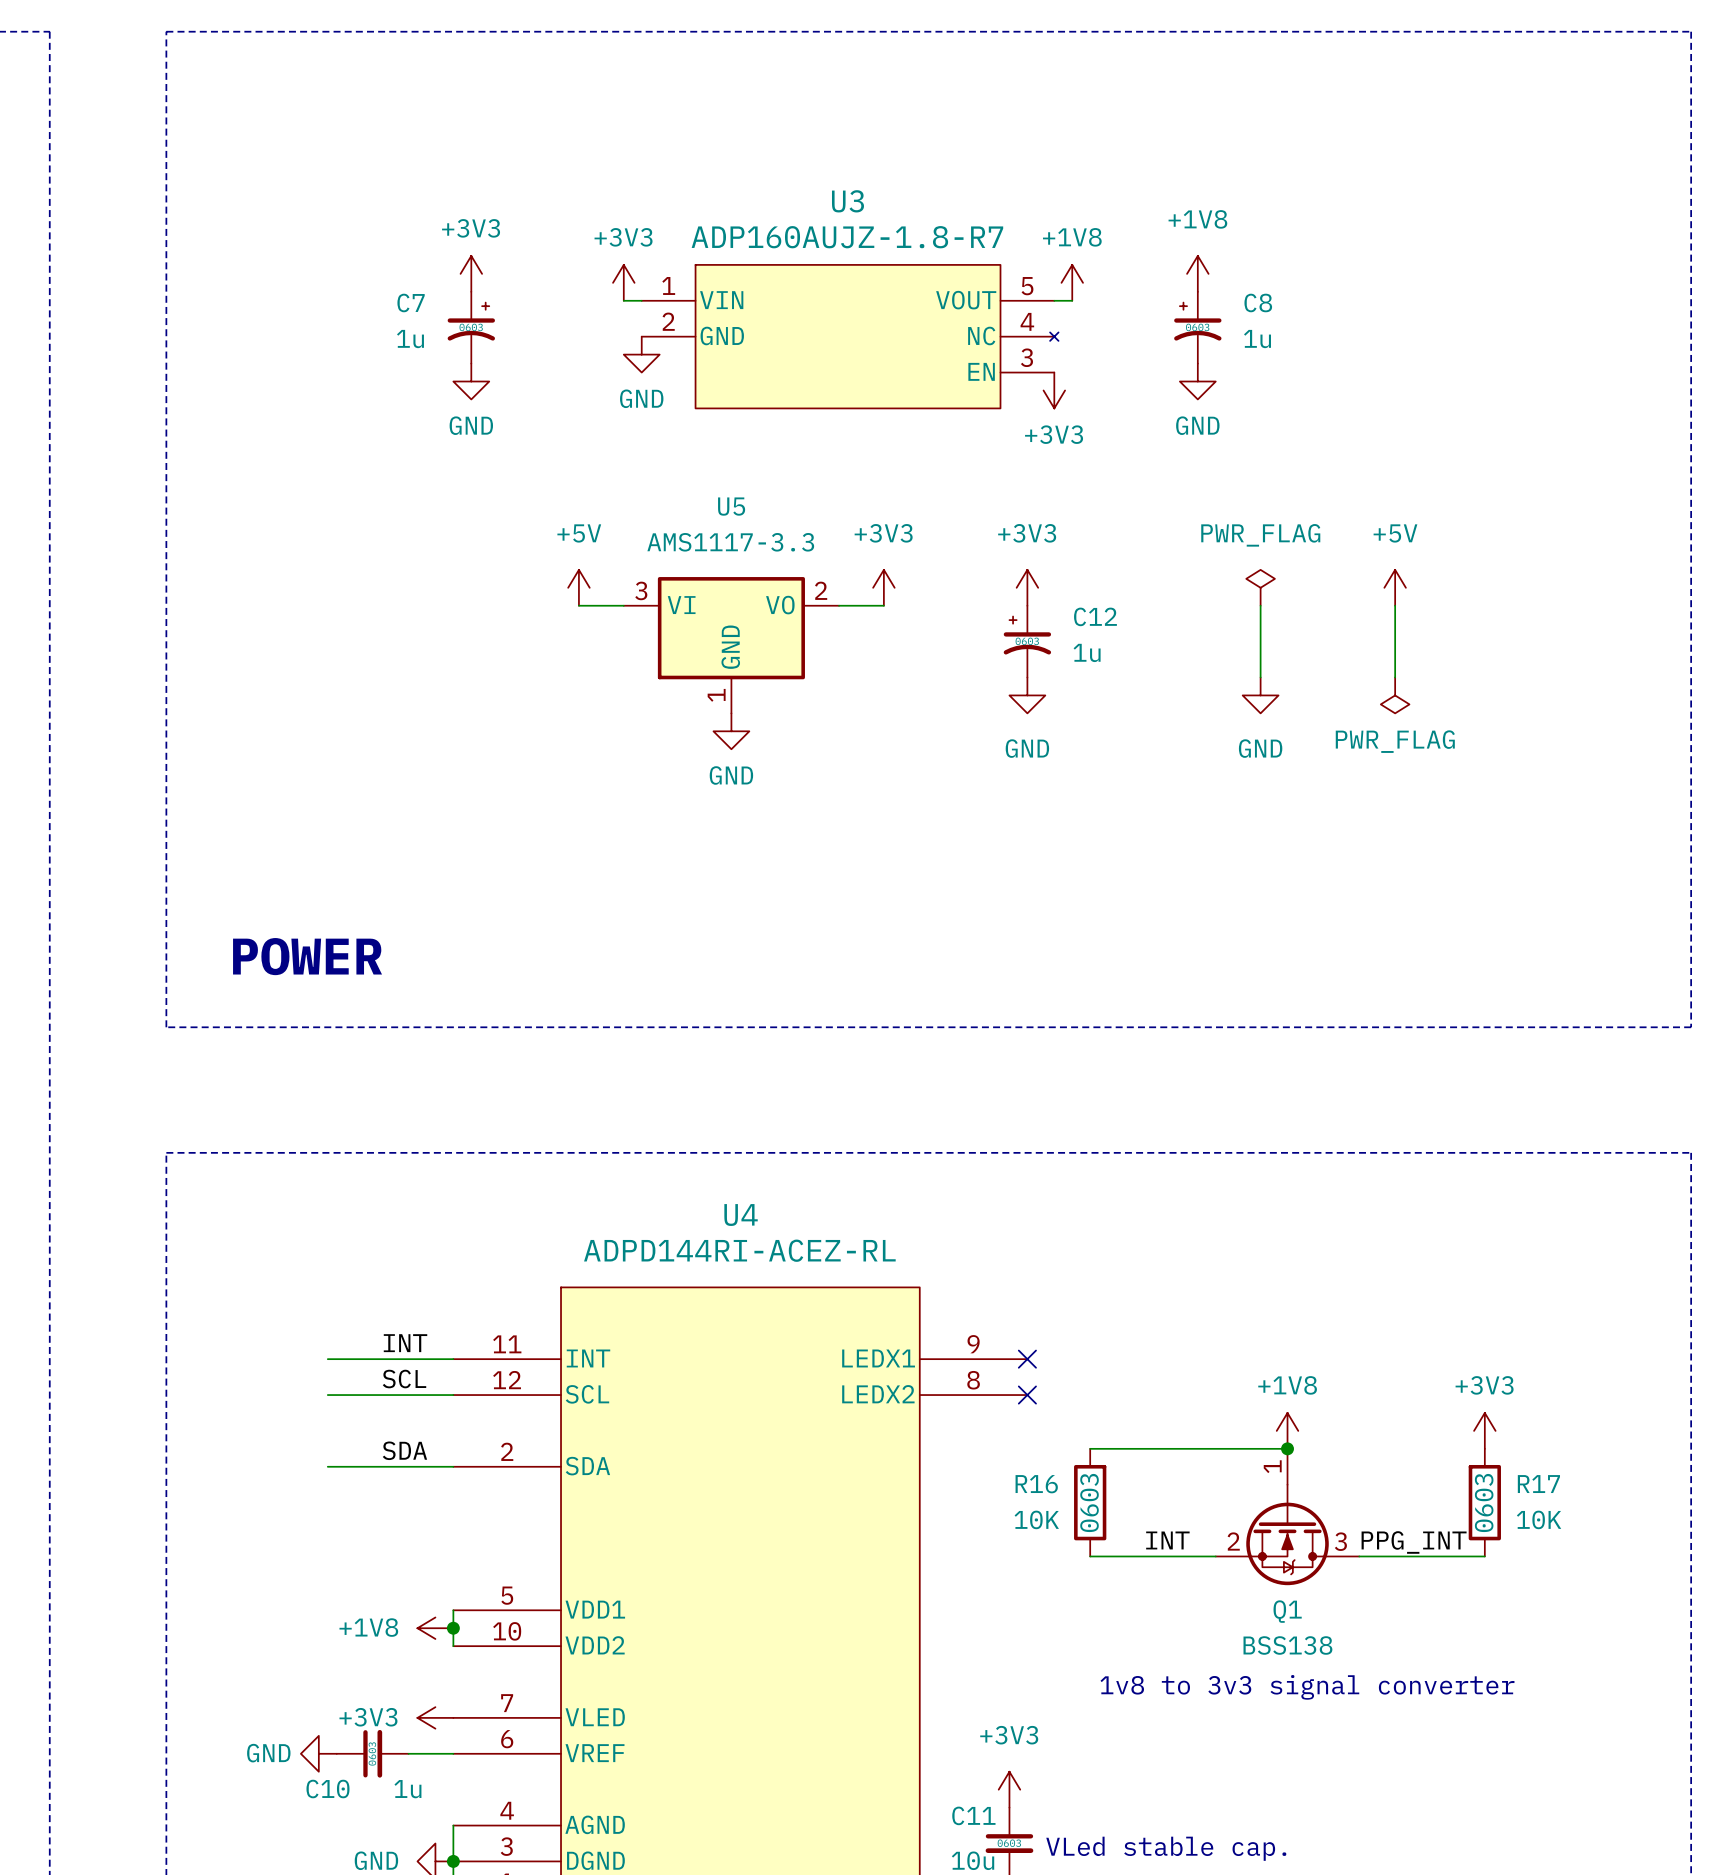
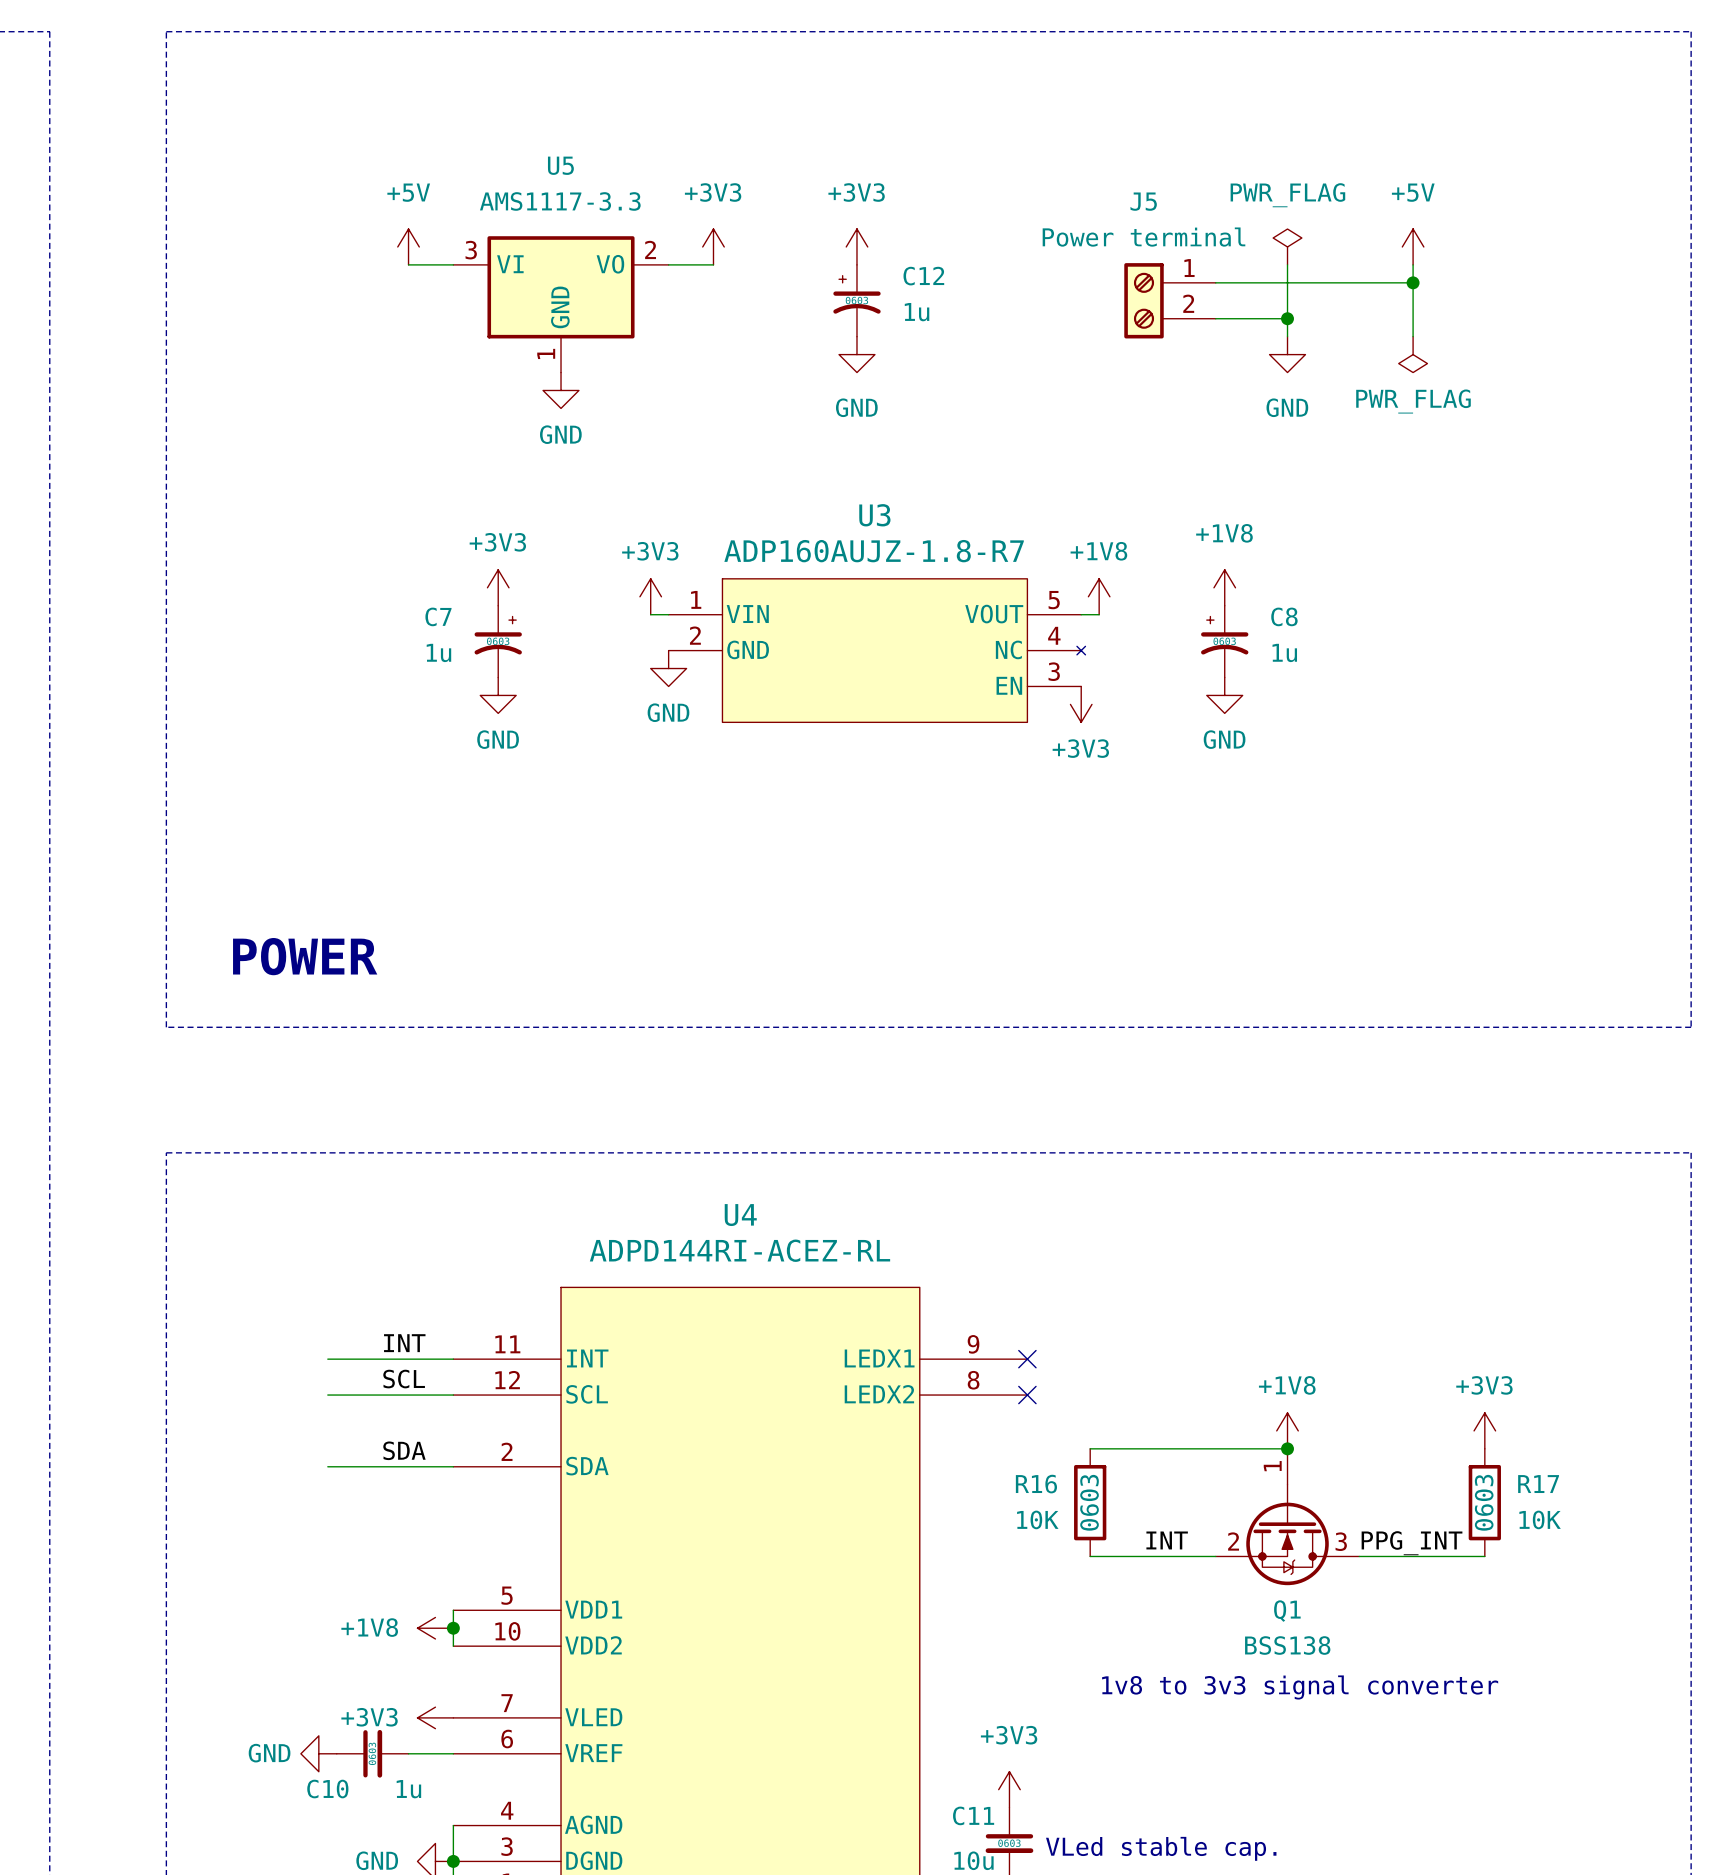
power symbol text position: +3V3 (623, 237) -> +3V3 (713, 192)
power symbol: none -> +5V (408, 246)
power symbol: none -> +3V3 (856, 246)
power symbol: none -> PWR_FLAG (1287, 246)
wire: none -> (408, 264) (453, 264)
power symbol: +3V3 (471, 273) -> none
power symbol: +1V8 (1197, 273) -> none
power symbol position: +3V3 (623, 282) -> +3V3 (713, 246)
power symbol: +1V8 (1072, 282) -> none
wire: none -> (1215, 282) (1413, 282)
junction: none -> (1413, 282)
wire: (1054, 300) (1072, 300) -> (1081, 614) (1099, 614)
J5: none -> Power terminal (1170, 300)
wire: none -> (1215, 318) (1287, 318)
junction: none -> (1287, 318)
C7 position: (471, 327) -> (498, 641)
C8 position: (1197, 327) -> (1224, 641)
U3 position: (850, 336) -> (877, 650)
power symbol: GND (641, 354) -> none
power symbol: none -> GND (856, 354)
power symbol: none -> PWR_FLAG (1413, 354)
power symbol: GND (471, 381) -> none
power symbol position: GND (1197, 381) -> GND (1287, 354)
power symbol: none -> GND (561, 390)
power symbol: +3V3 (1054, 390) -> none
power symbol text position: GND (1197, 425) -> GND (1287, 407)
power symbol: none -> +3V3 (498, 587)
power symbol: +5V (578, 587) -> none
power symbol: +3V3 (883, 587) -> none
power symbol: +3V3 (1027, 587) -> none
power symbol: none -> +1V8 (1224, 587)
power symbol: PWR_FLAG (1260, 587) -> none
power symbol position: +5V (1395, 587) -> +5V (1413, 246)
power symbol: none -> +3V3 (650, 596)
power symbol: none -> +1V8 (1099, 596)
wire: (578, 605) (623, 605) -> (668, 264) (713, 264)
wire: (1260, 605) (1260, 677) -> (1287, 264) (1287, 336)
wire: (1395, 605) (1395, 677) -> (1413, 264) (1413, 336)
C12 position: (1027, 641) -> (856, 300)
U5 position: (731, 645) -> (561, 304)
power symbol: none -> GND (498, 695)
power symbol: GND (1027, 695) -> none
power symbol position: GND (1260, 695) -> GND (1224, 695)
power symbol: PWR_FLAG (1395, 695) -> none
power symbol: none -> +3V3 (1081, 704)
power symbol position: GND (731, 731) -> GND (668, 668)
power symbol text position: GND (1260, 748) -> GND (1224, 739)

